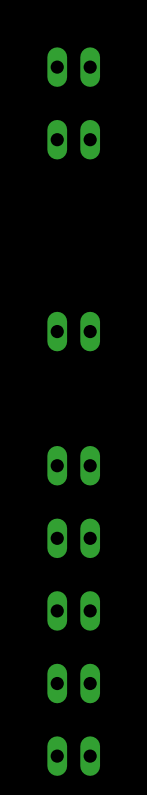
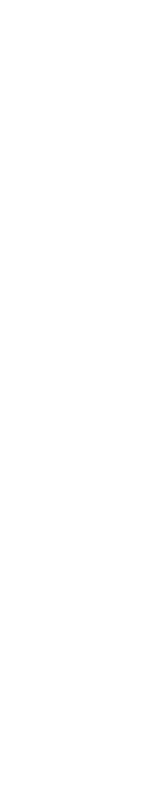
part: (73, 67) -> none
part: (73, 139) -> none
part: (73, 331) -> none
part: (73, 465) -> none
part: (73, 538) -> none
part: (73, 610) -> none
part: (73, 683) -> none
part: (73, 756) -> none

